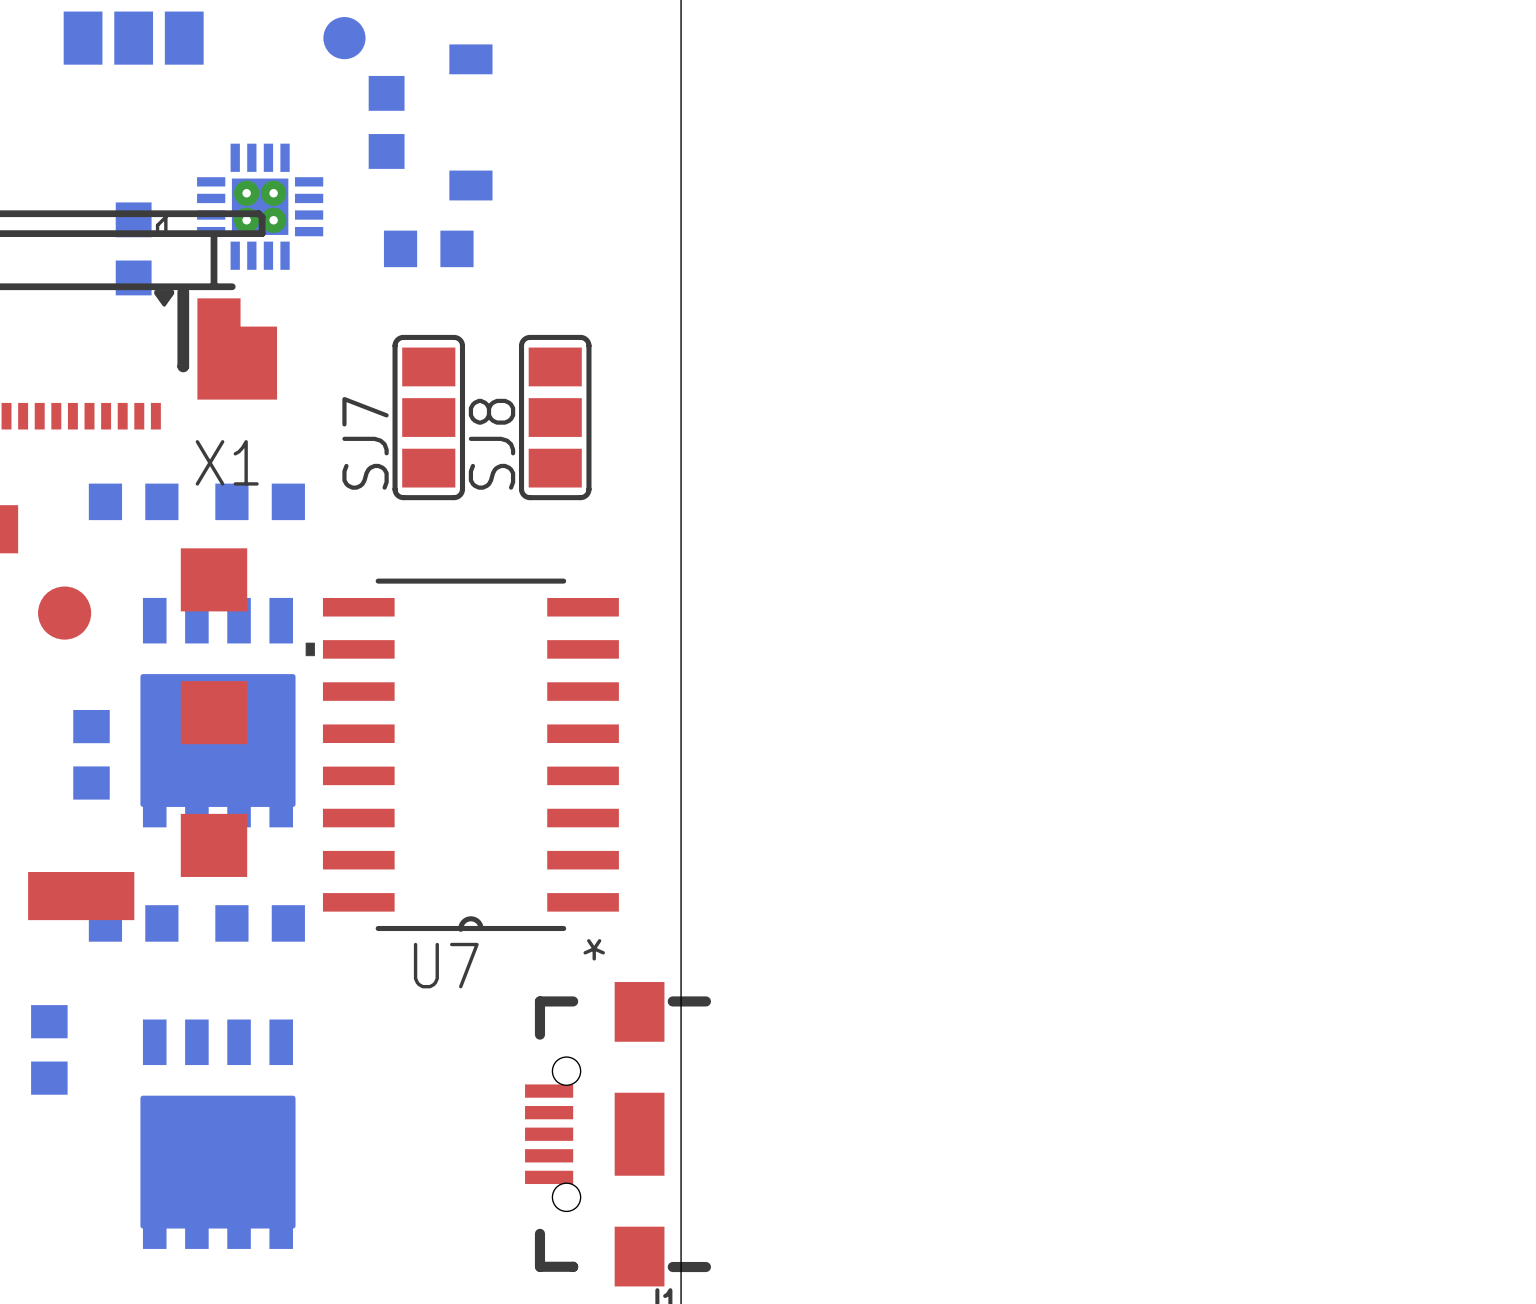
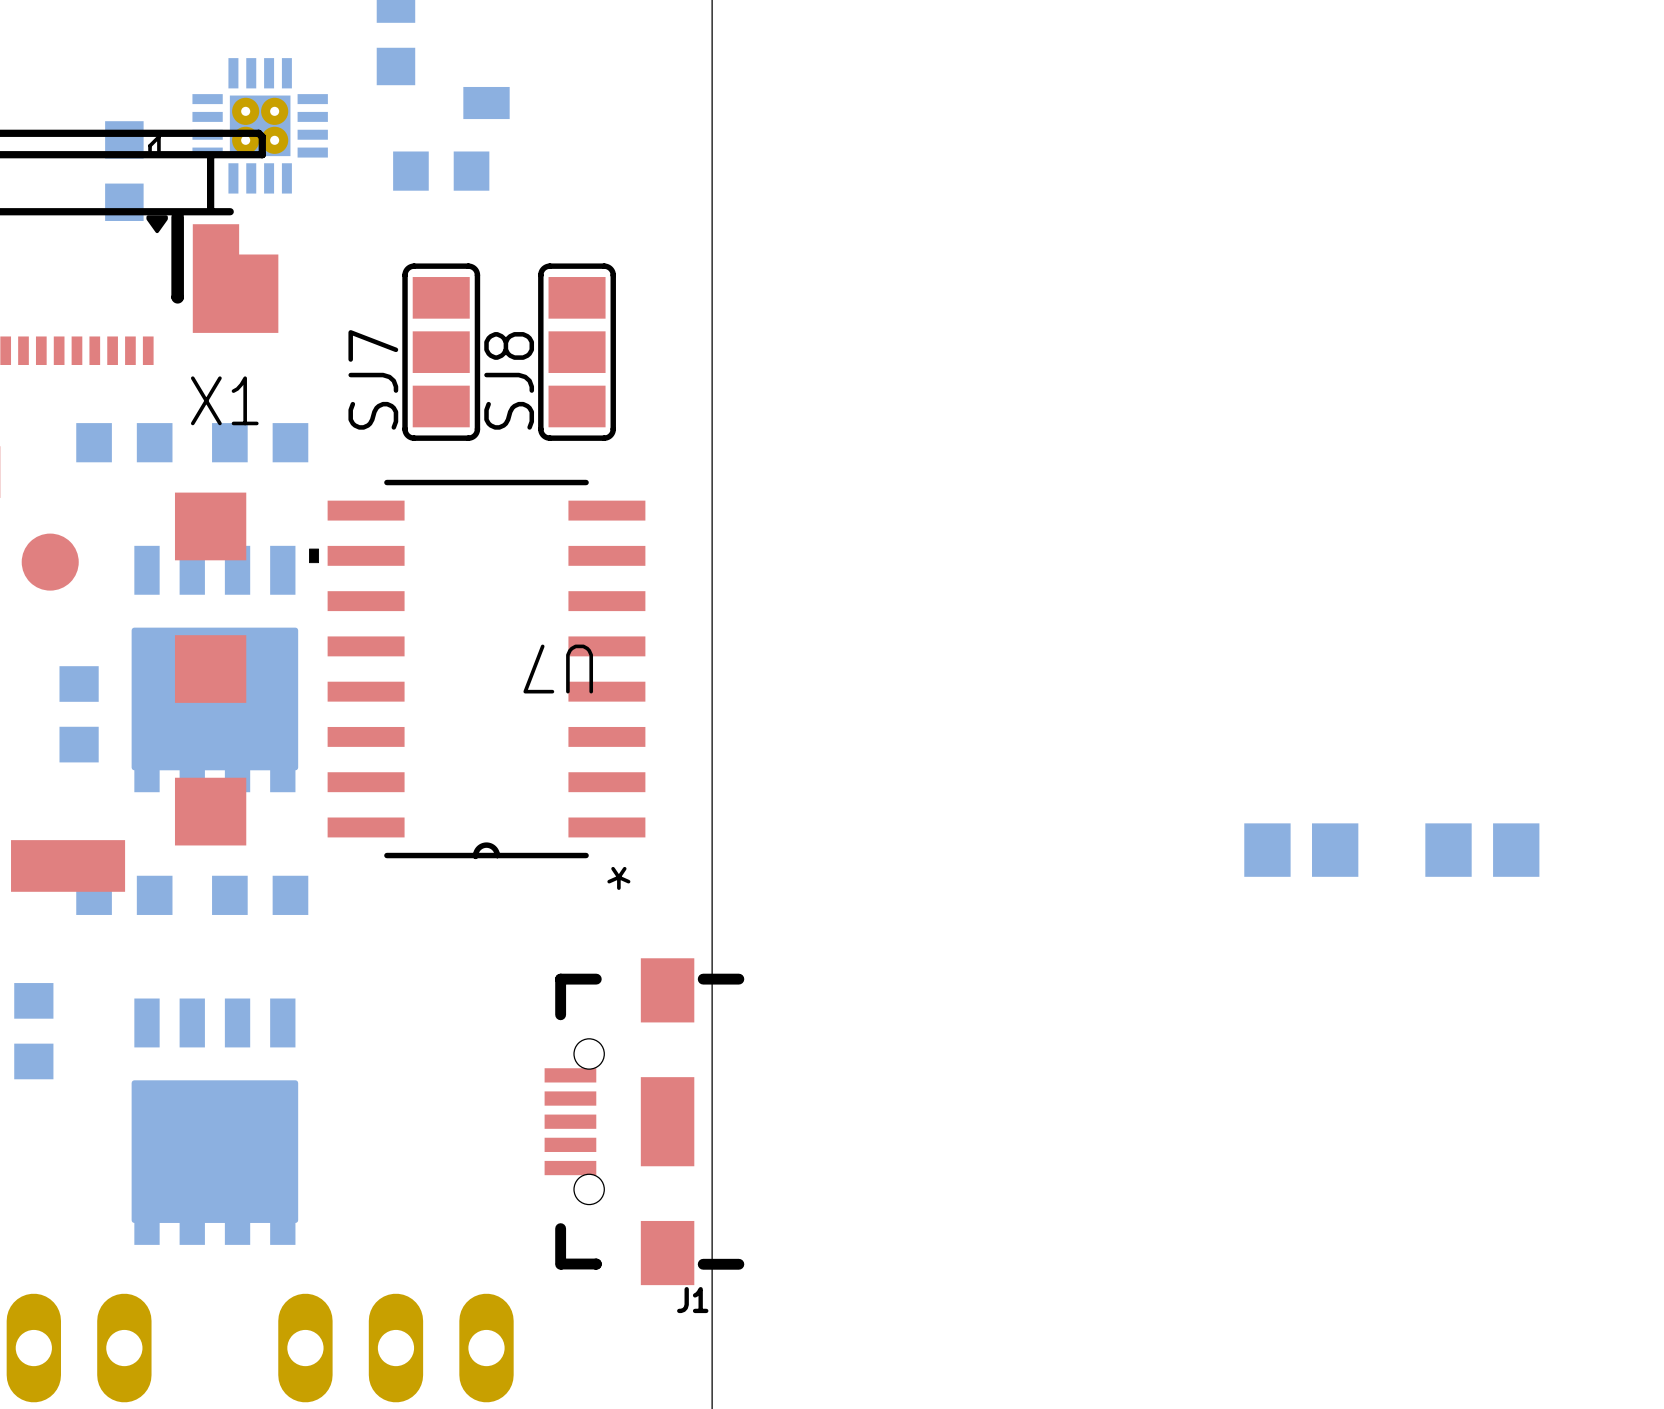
U7 position: (462, 755) -> (477, 669)
part: none -> (1301, 850)
part: none -> (1482, 850)
U7 name rotation: 0° (446, 965) -> 180° (558, 669)
U7 name position: U7 (446, 965) -> U7 (558, 669)

